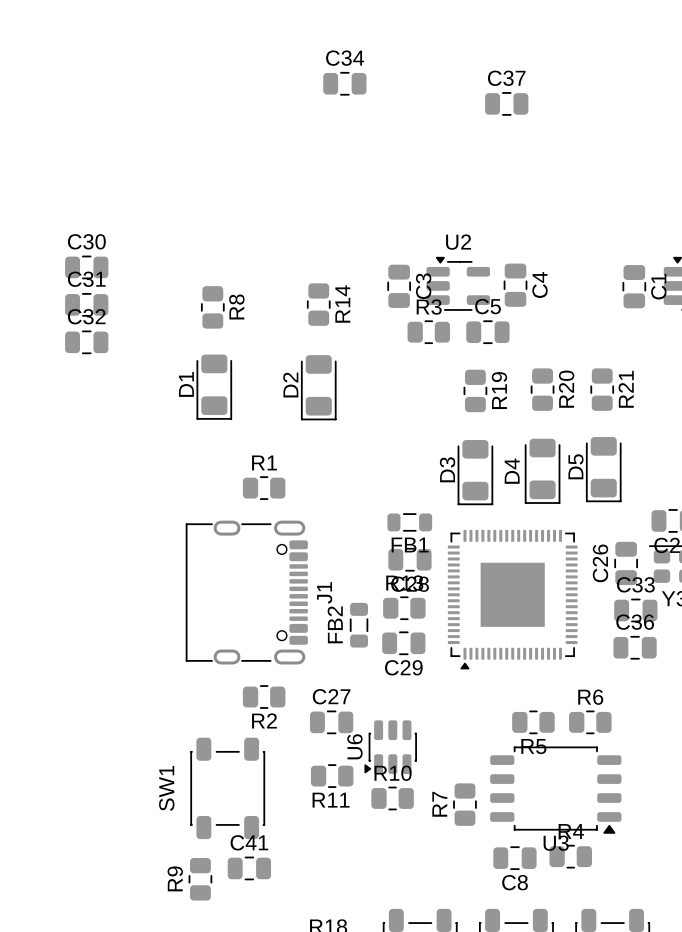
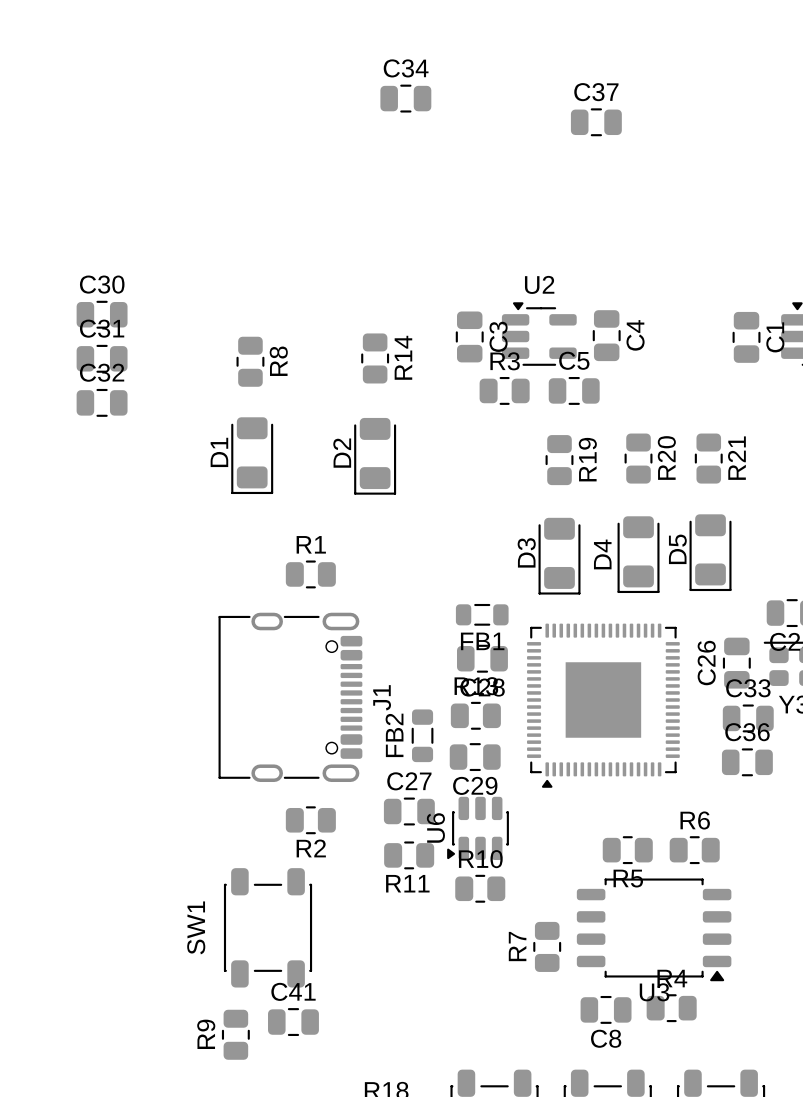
C27 position: (331, 722) -> (409, 811)
U6 position: (390, 747) -> (478, 828)
R11 position: (332, 776) -> (409, 855)
R10 position: (392, 798) -> (480, 888)

